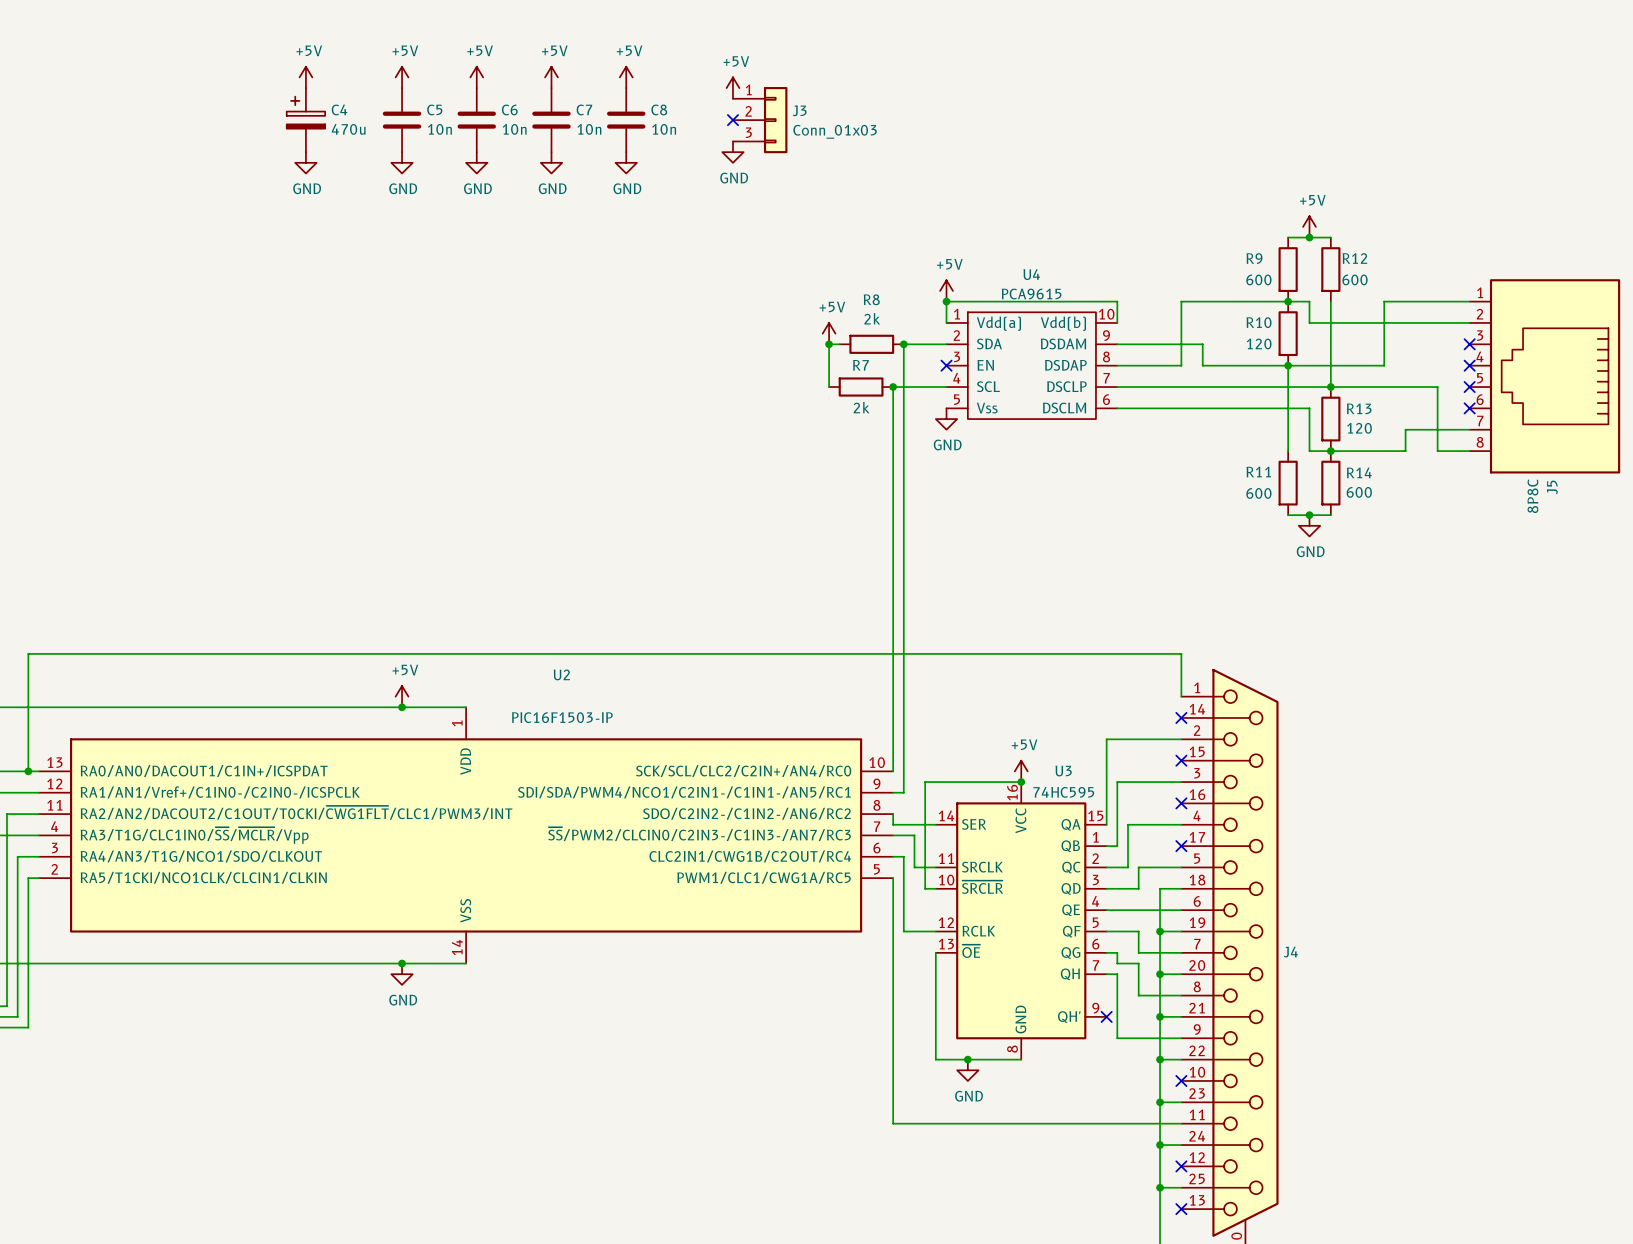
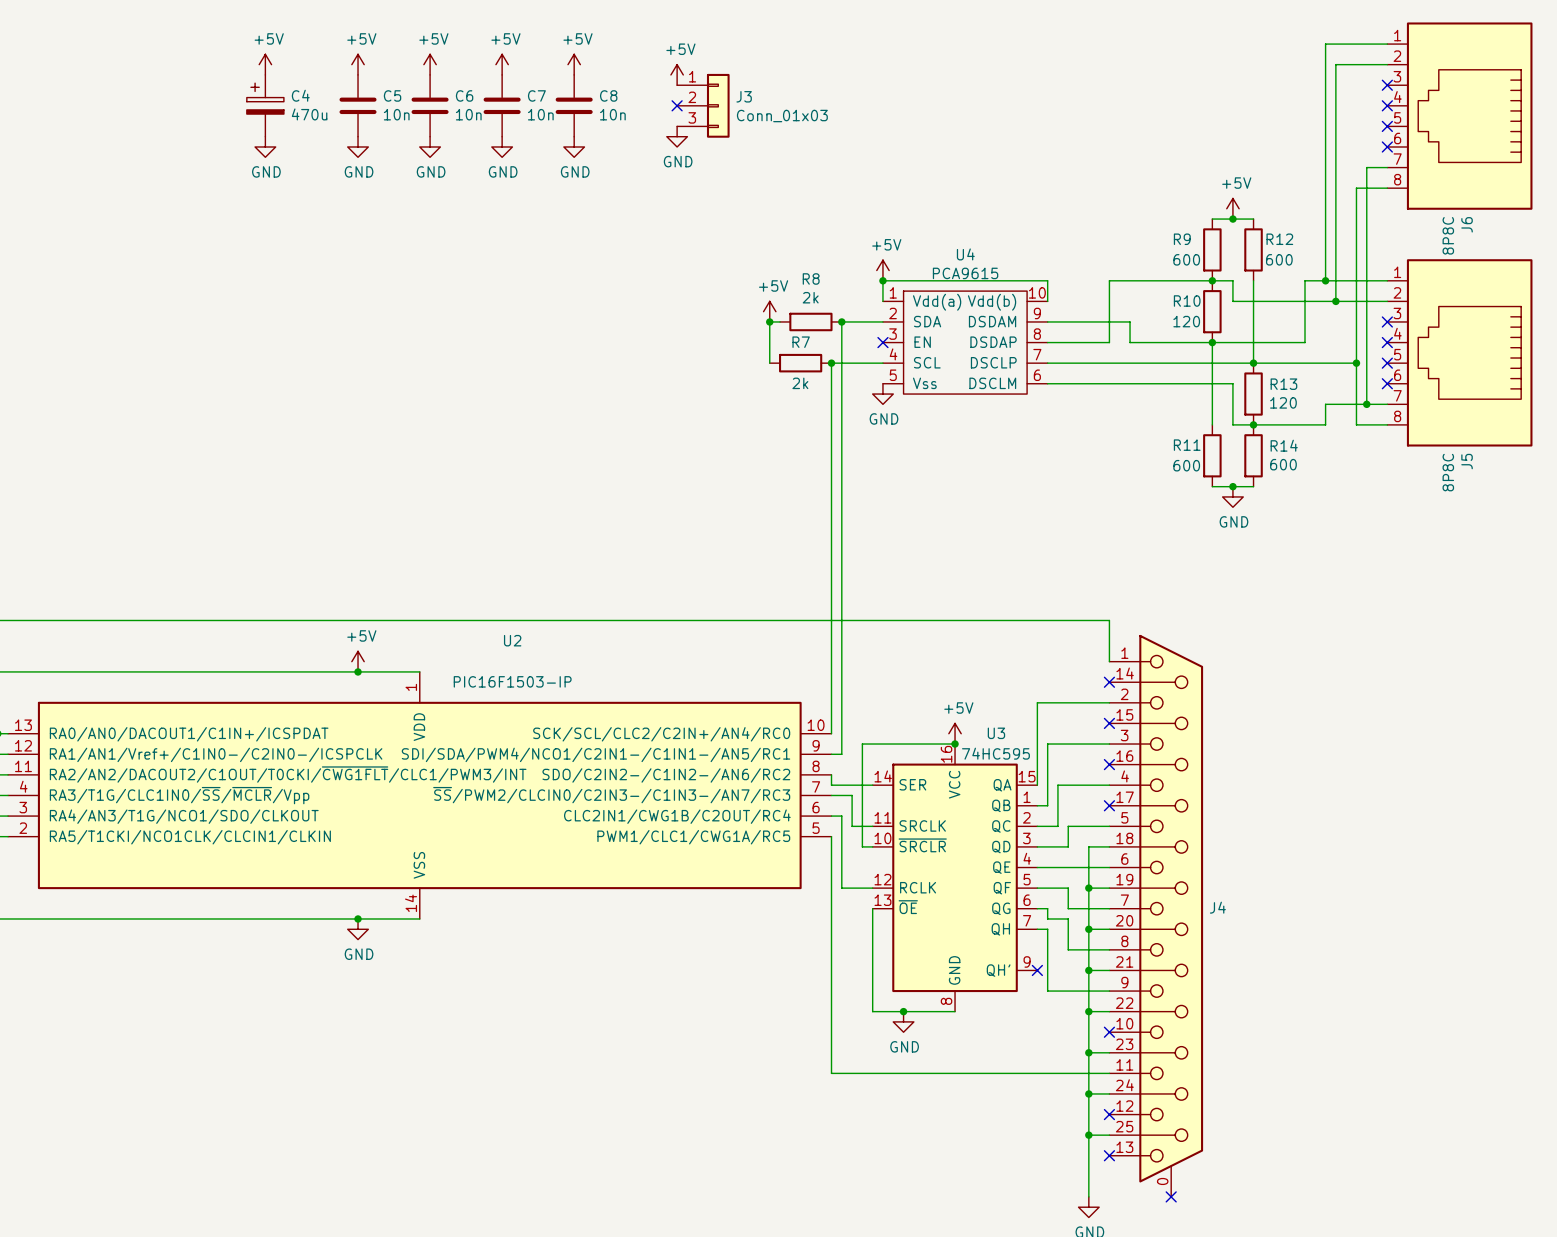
wire: none -> (1387, 44) (1325, 44) (1325, 280)
wire: none -> (1387, 64) (1335, 64) (1335, 301)
no-connect mark: none -> (1387, 85)
no-connect mark: none -> (1387, 105)
J6: none -> 8P8C (1459, 116)
no-connect mark: none -> (1387, 126)
no-connect mark: none -> (1387, 146)
wire: none -> (1387, 167) (1366, 167) (1366, 404)
wire: none -> (1387, 188) (1356, 188) (1356, 363)
junction: none -> (1325, 280)
junction: none -> (1335, 301)
junction: none -> (1356, 363)
junction: none -> (1366, 404)

